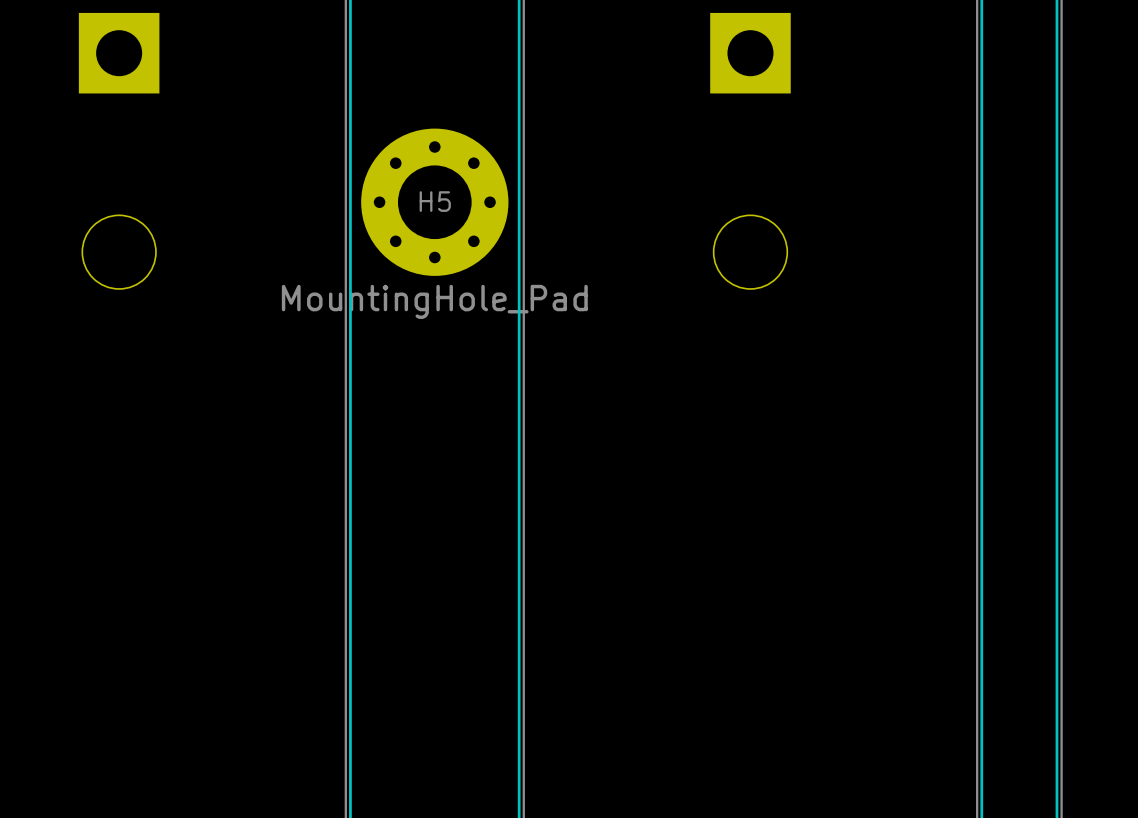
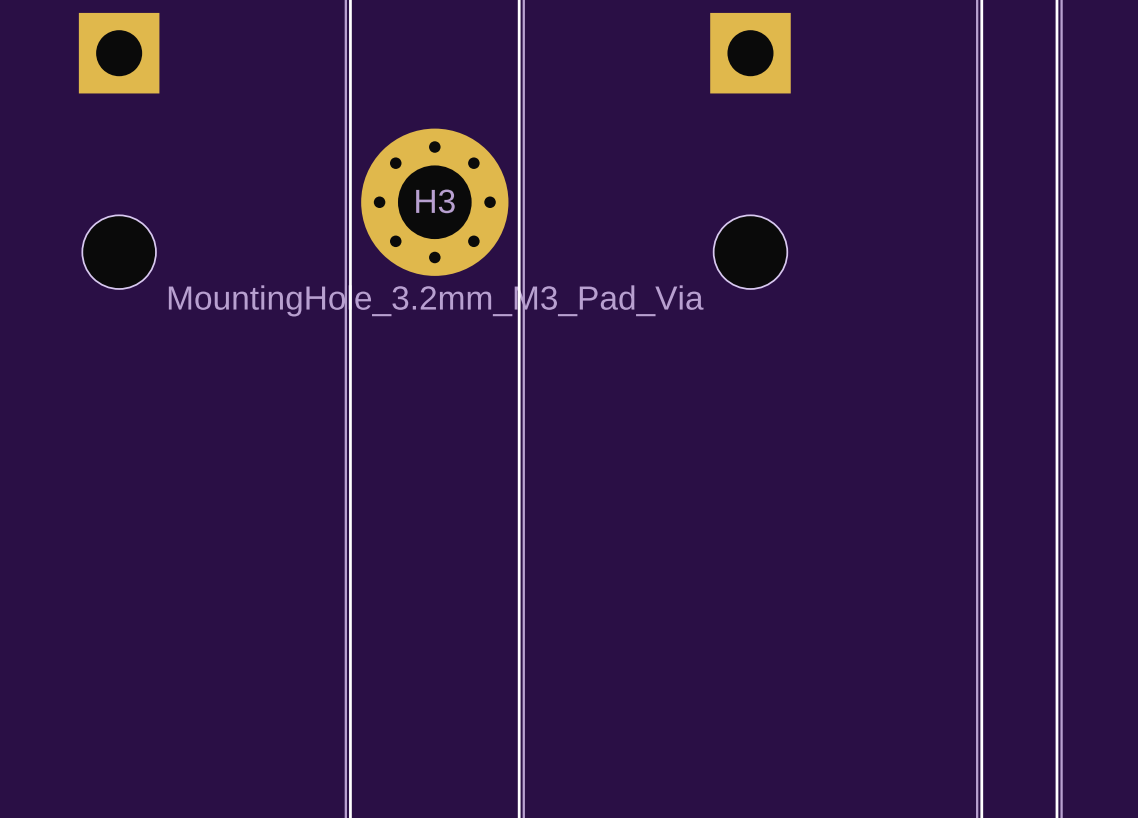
H5 name: H5 (435, 201) -> H3 (435, 201)
H5 value: MountingHole_Pad (434, 301) -> MountingHole_3.2mm_M3_Pad_Via (436, 300)

